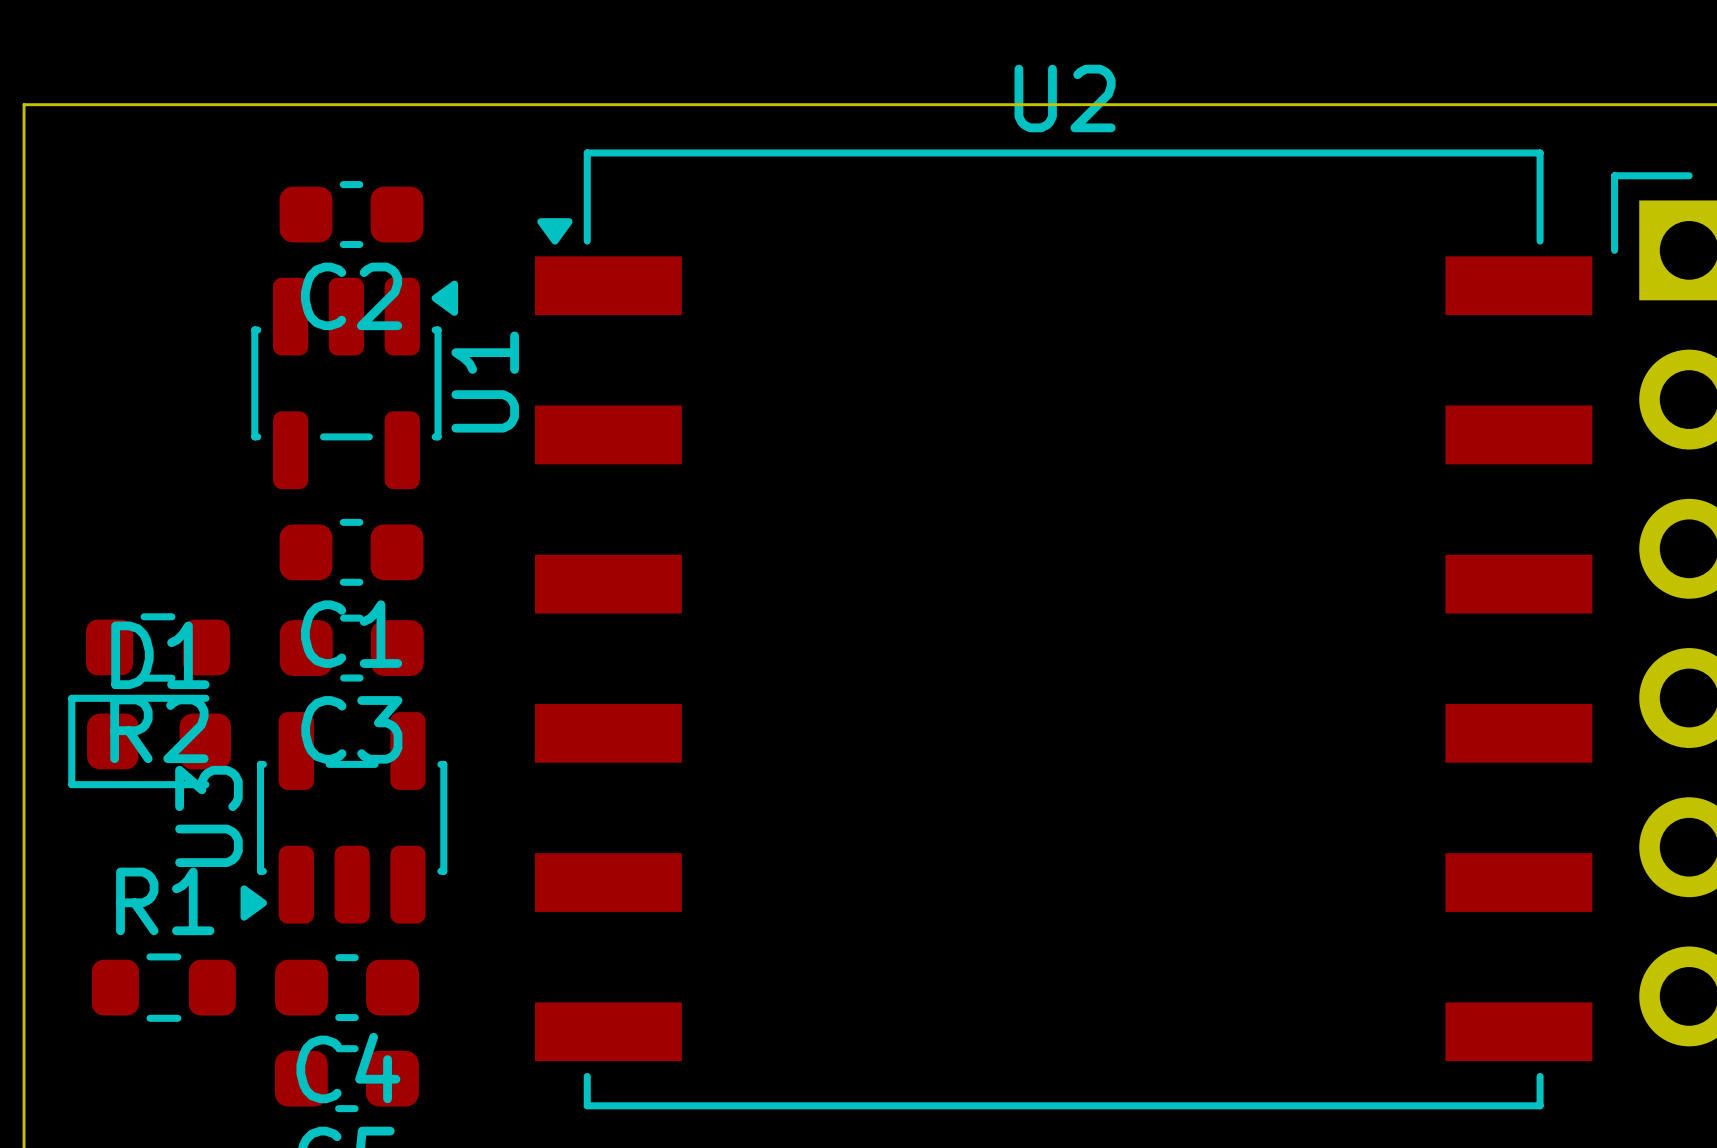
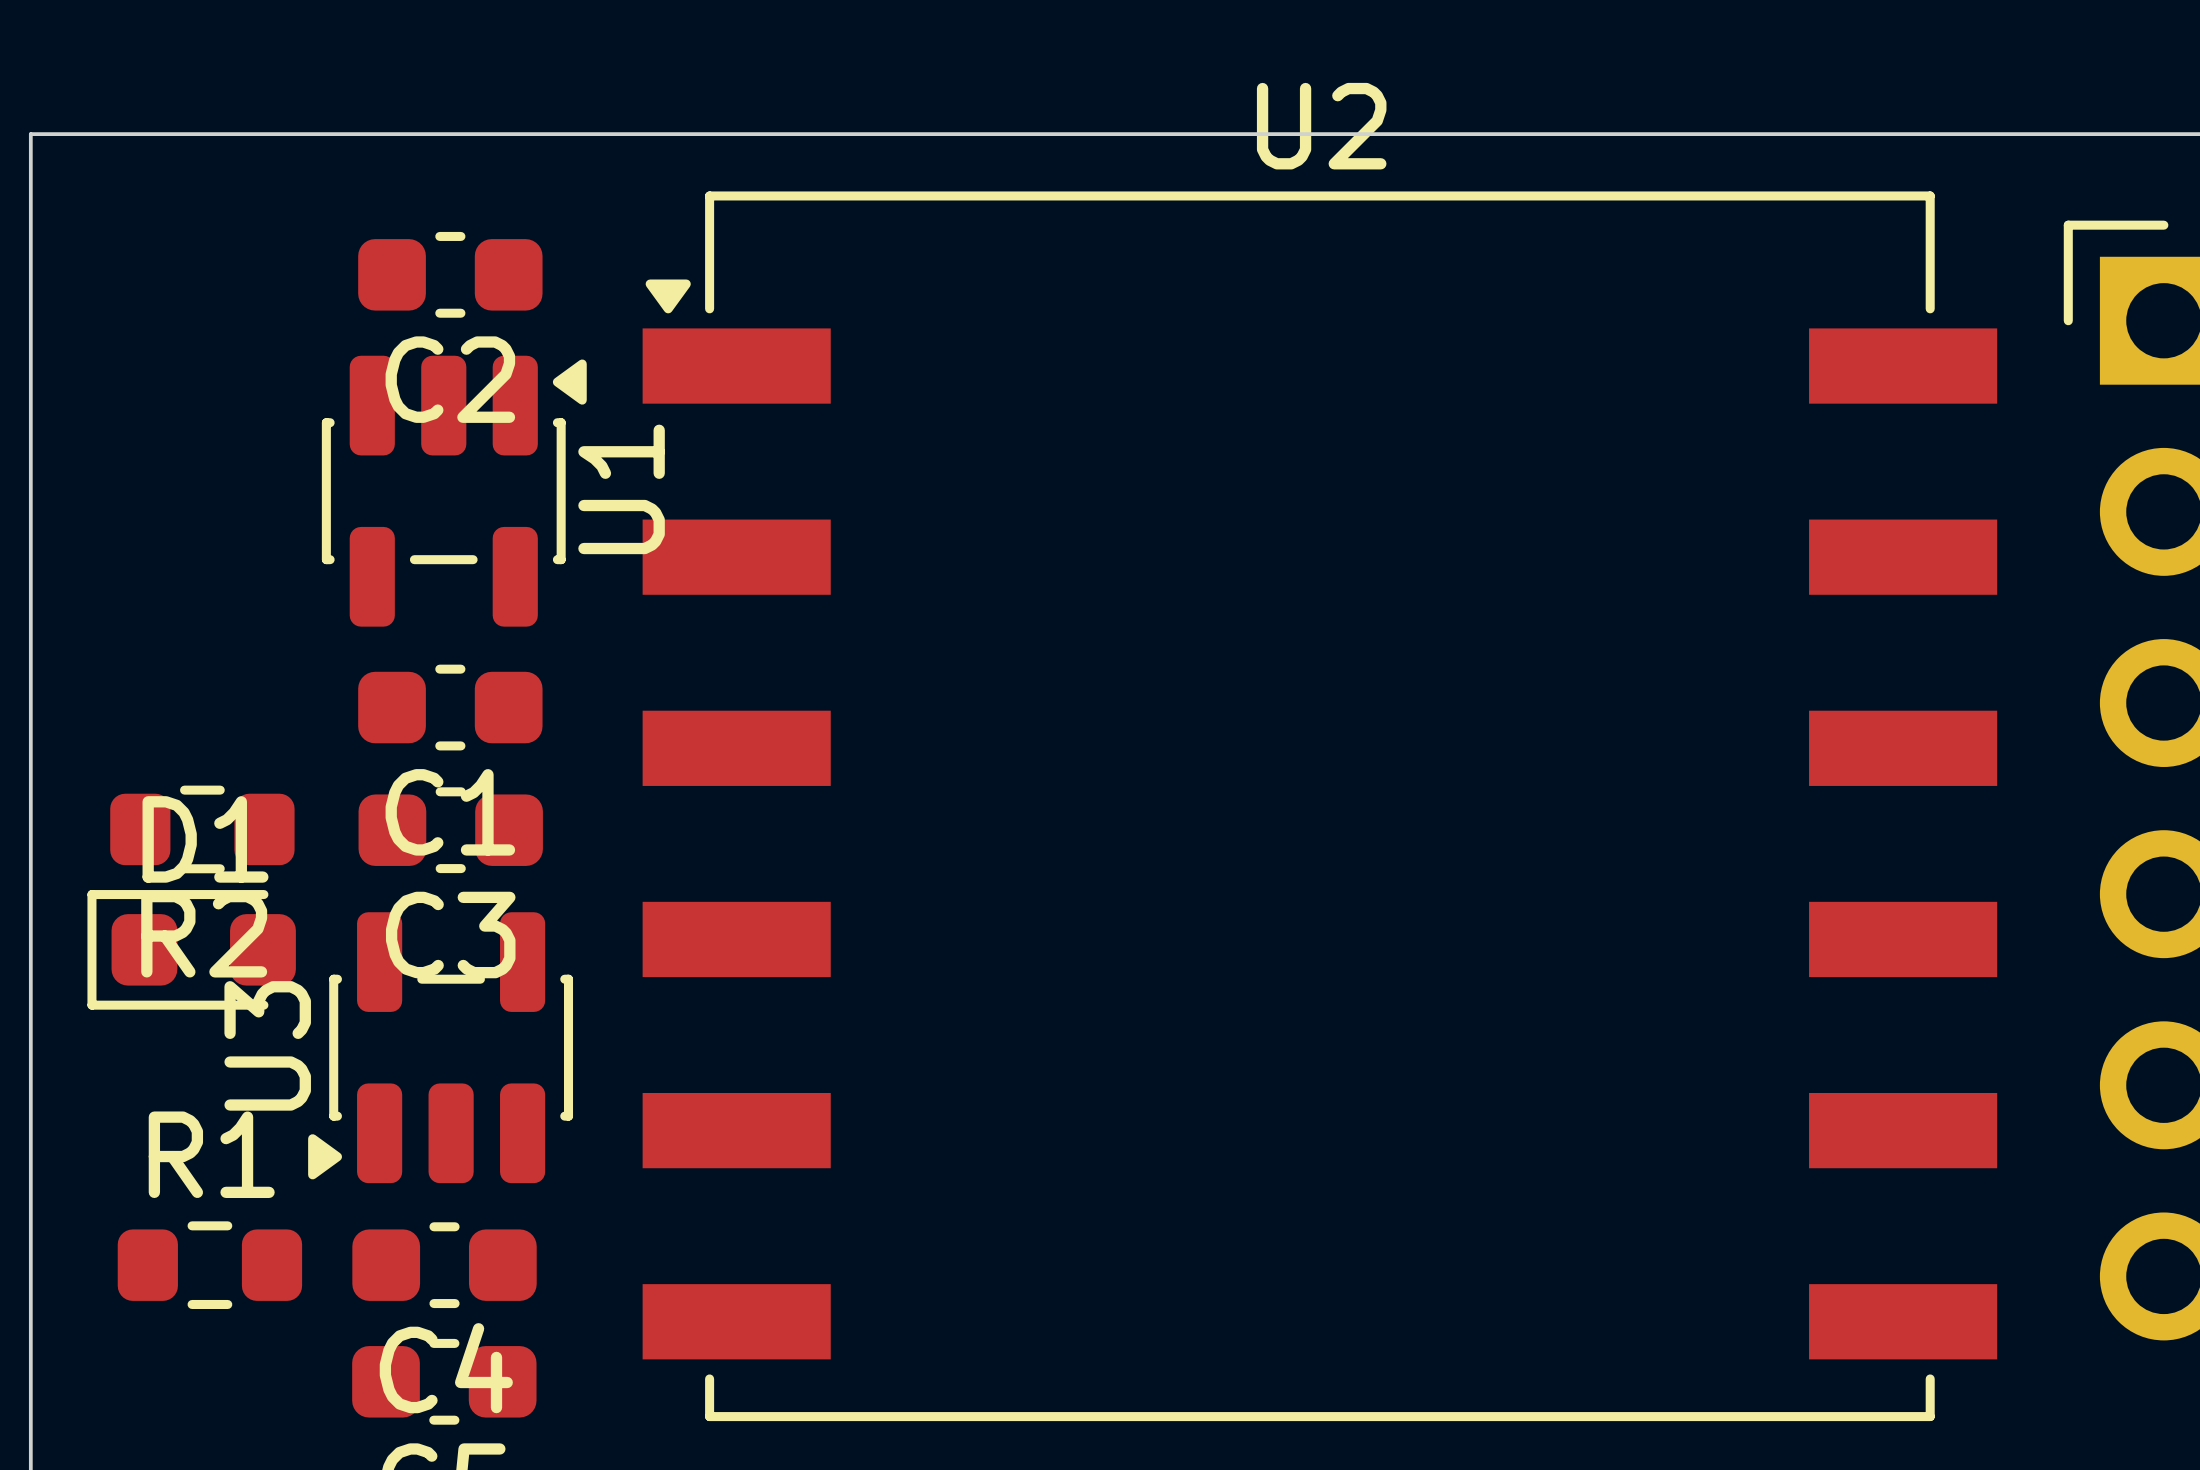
U2 position: (1063, 629) -> (1319, 806)

